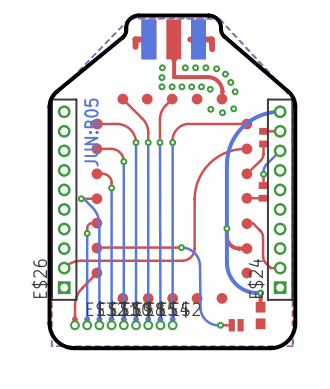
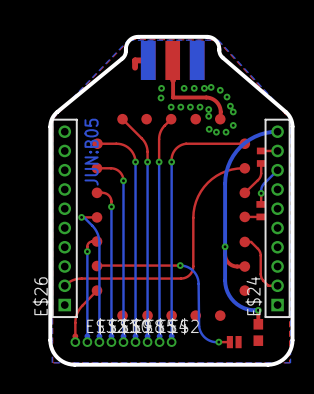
top track: (190, 39) (211, 39) (212, 49) -> none
via: none -> (211, 87)
via: (216, 68) -> none
via: none -> (220, 90)
via: (225, 74) -> none
via: none -> (227, 97)
via: (230, 82) -> none
via: none -> (230, 106)
via: (161, 86) -> none
via: none -> (208, 116)
via: none -> (233, 125)
via: (233, 108) -> none
via: none -> (216, 132)
via: (222, 112) -> none
via: none -> (226, 132)

